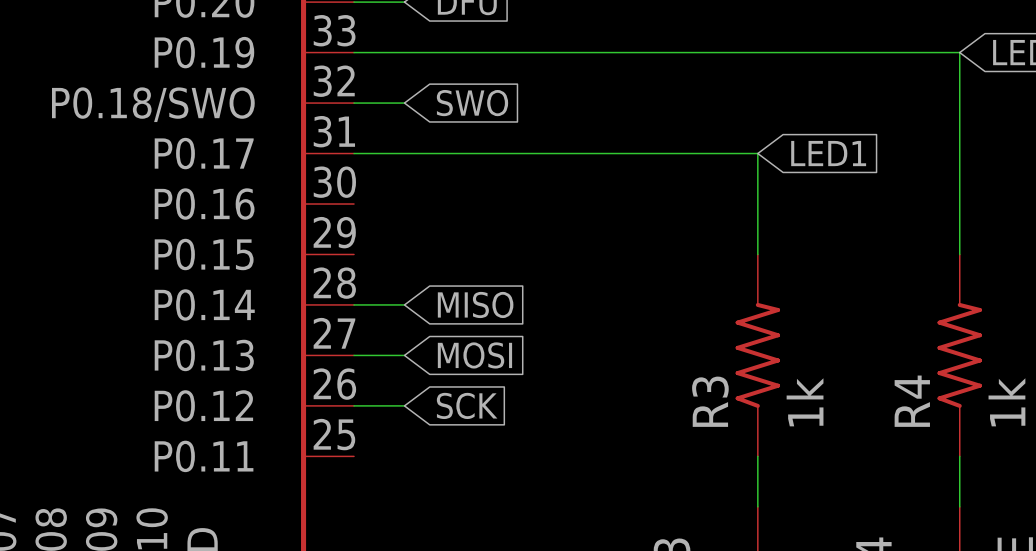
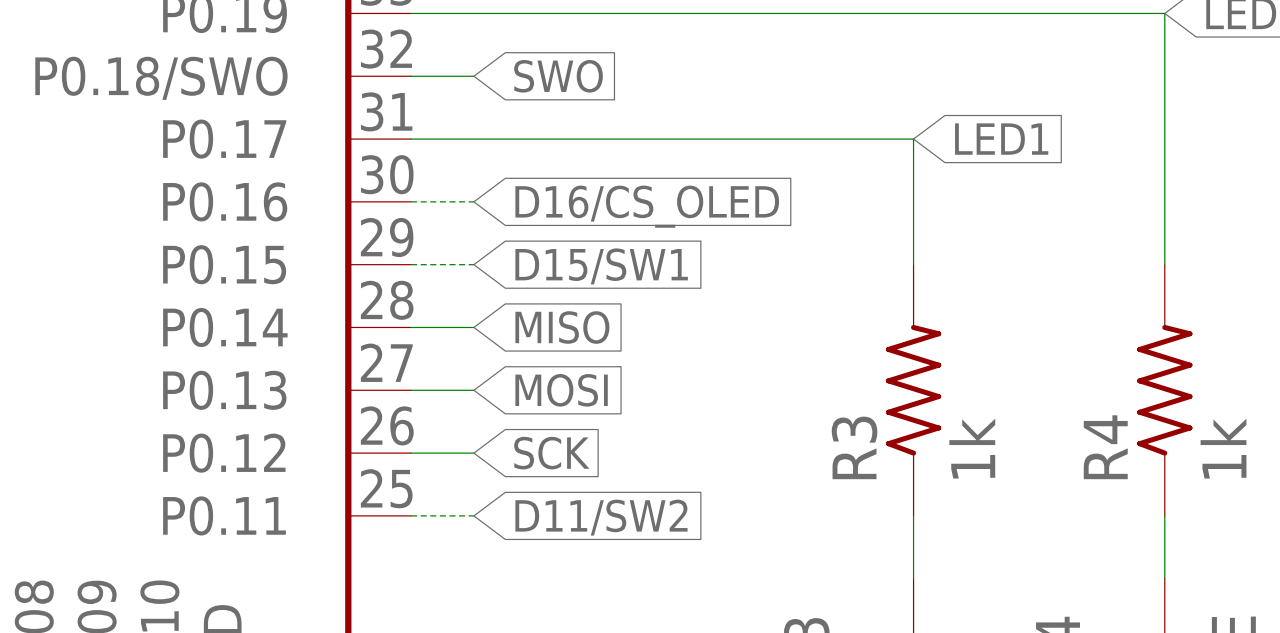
wire: none -> (411, 201) (473, 201)
global label: none -> D16/CS_OLED (647, 206)
wire: none -> (411, 264) (473, 264)
global label: none -> D15/SW1 (601, 266)
wire: none -> (411, 515) (473, 515)
global label: none -> D11/SW2 (601, 517)

